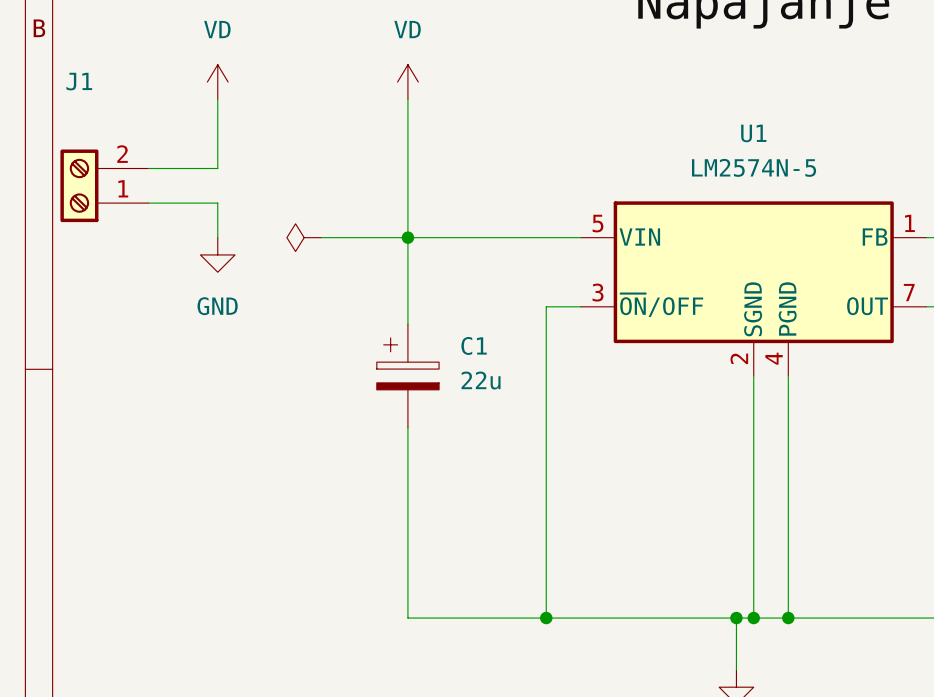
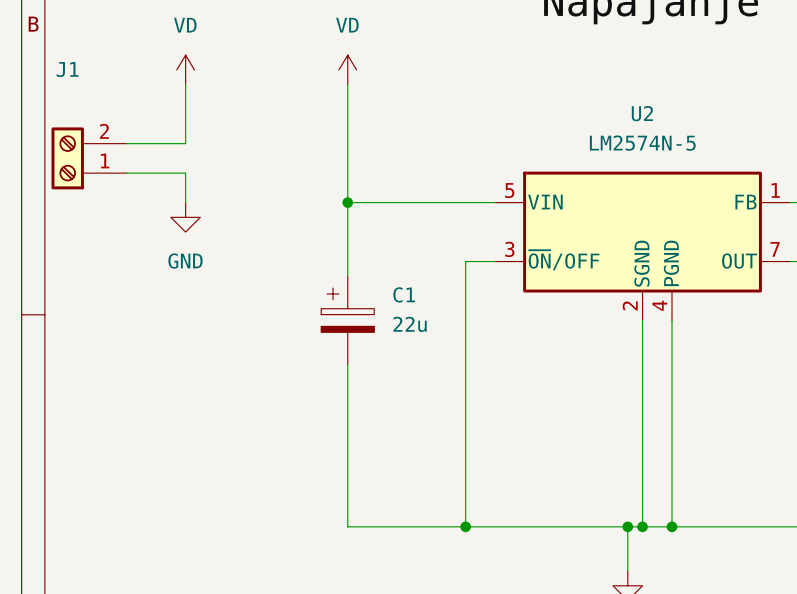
U1 name: U1 (753, 133) -> U2 (642, 113)
power symbol: (304, 237) -> none
wire: (321, 237) (407, 237) -> none

